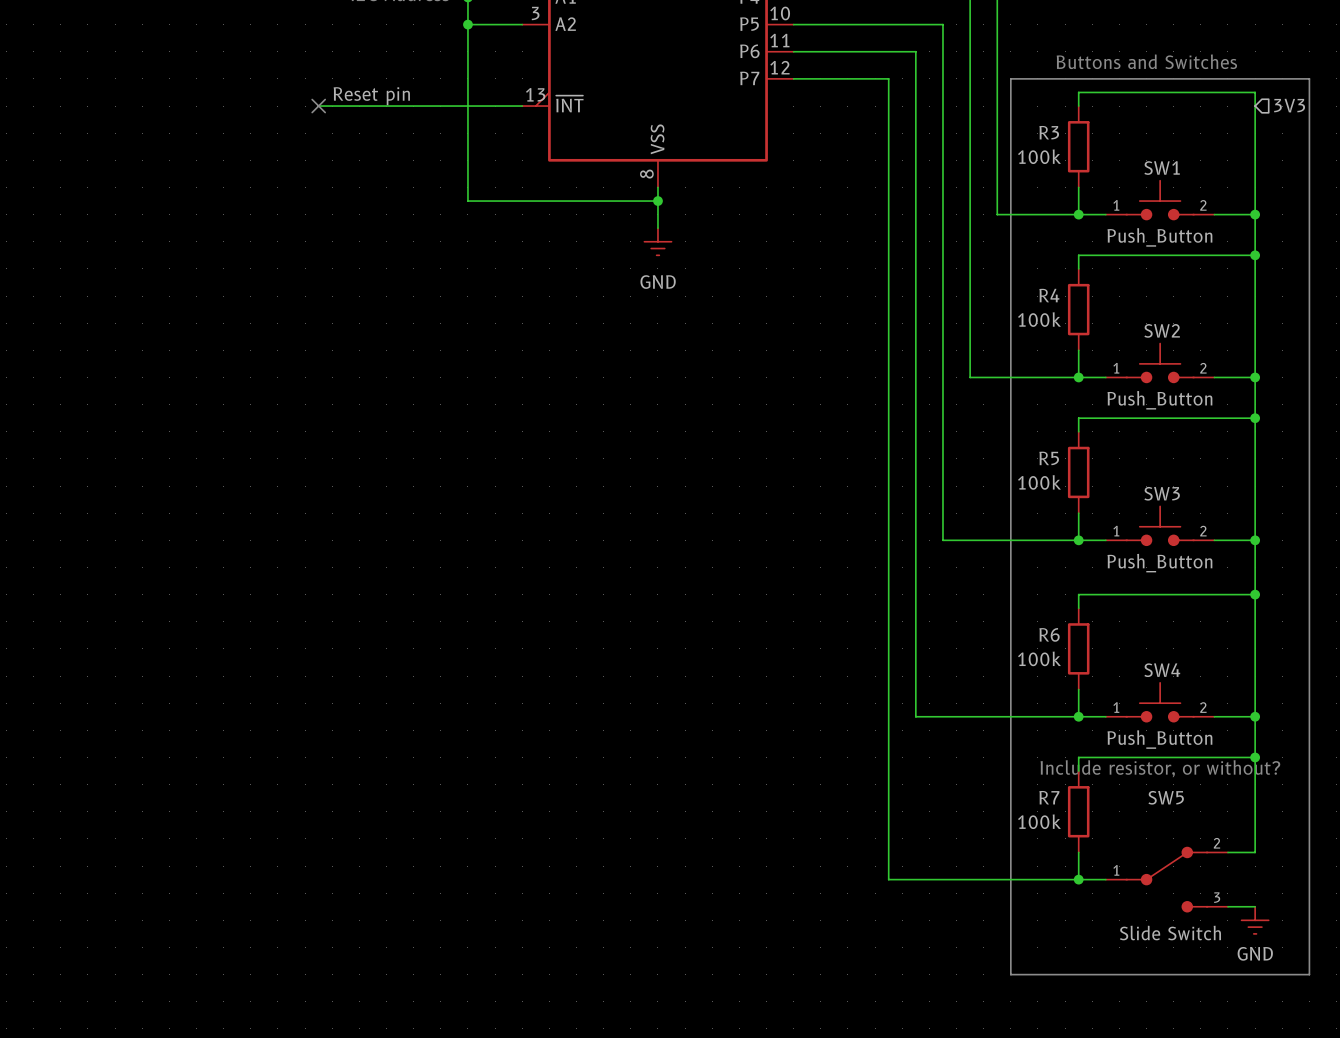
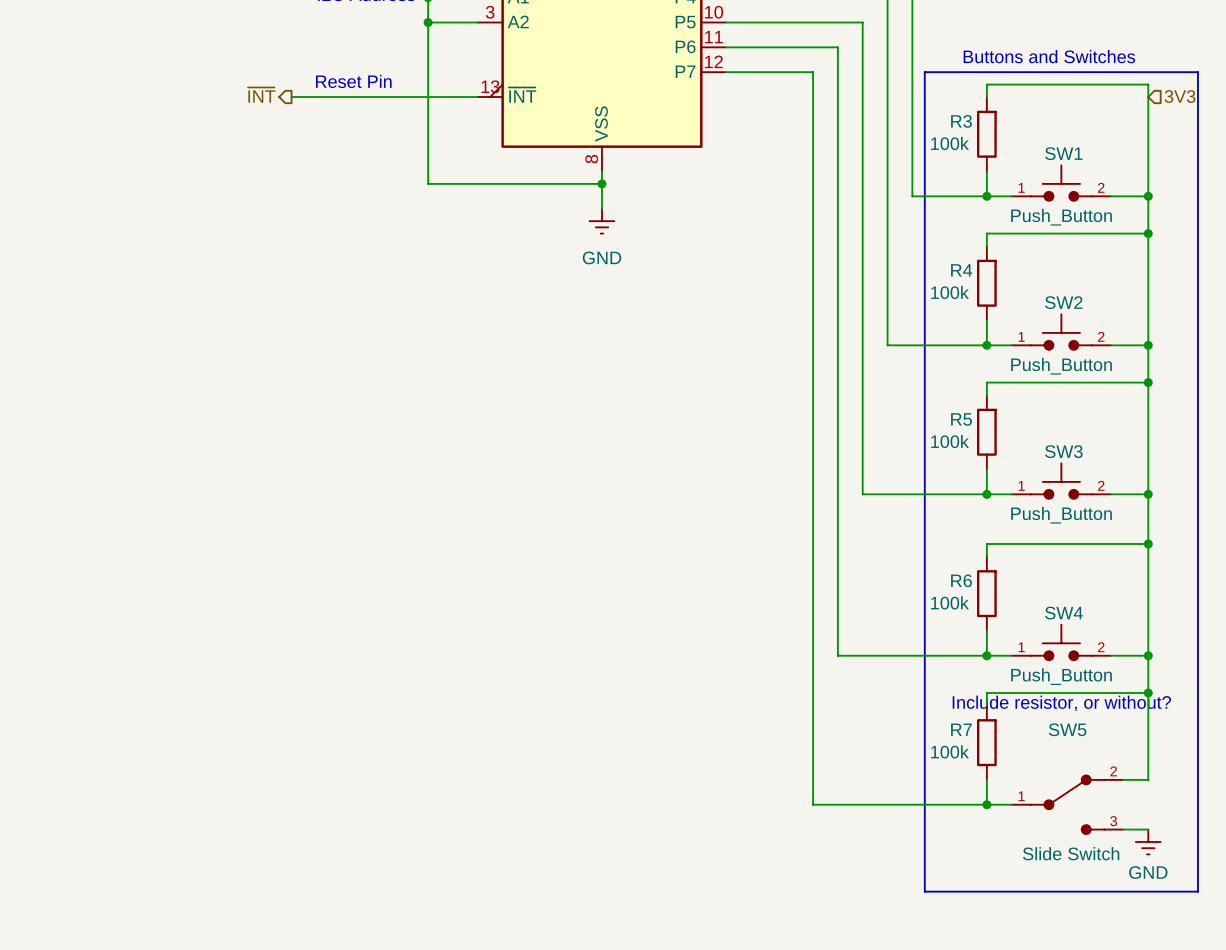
text: none -> Reset Pin (353, 81)
label: Reset pin (371, 96) -> none
hierarchical label: none -> ~{INT} (261, 95)
no-connect mark: (318, 106) -> none

